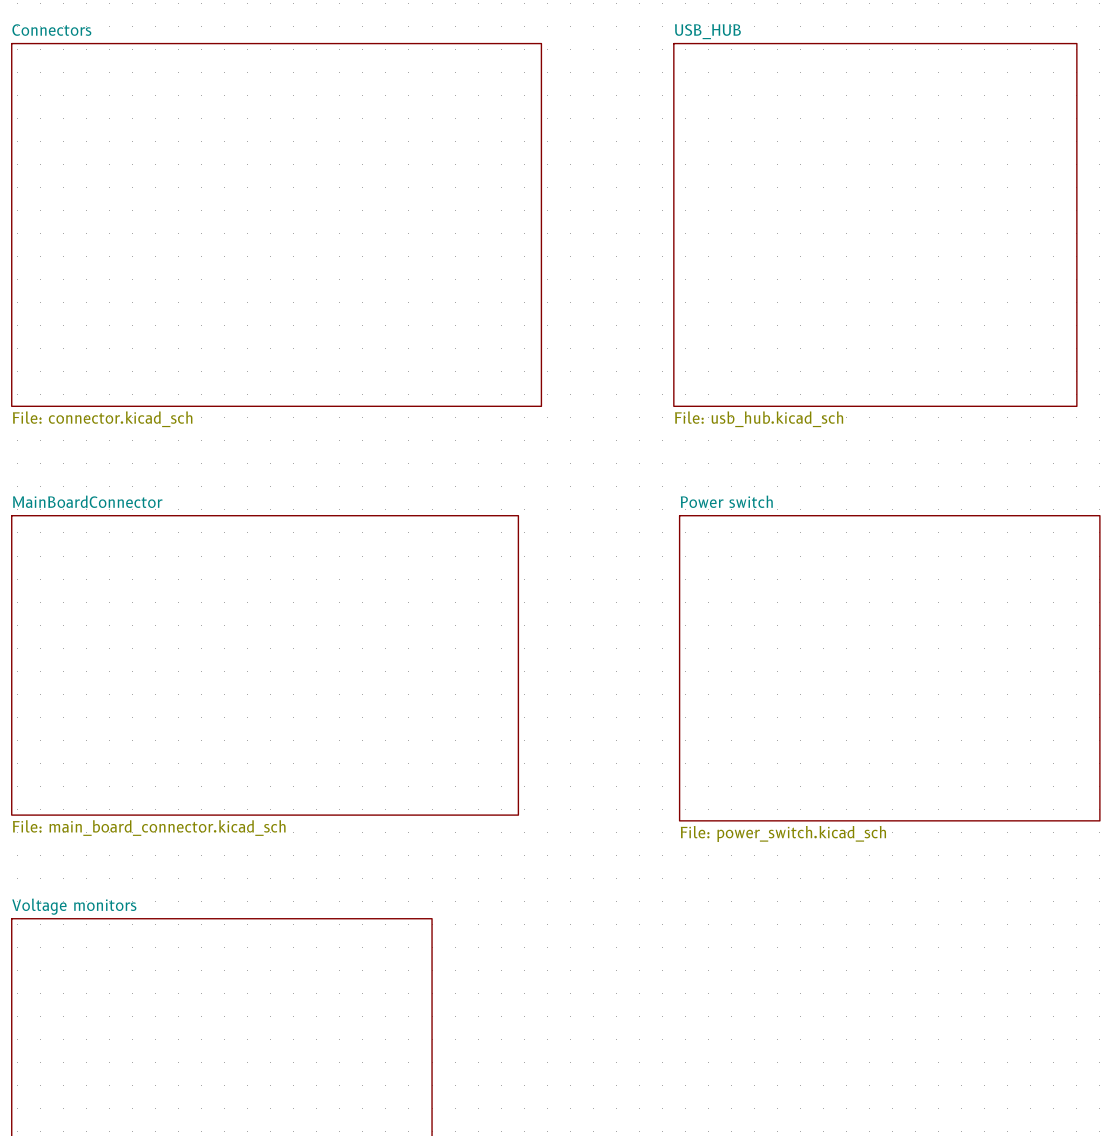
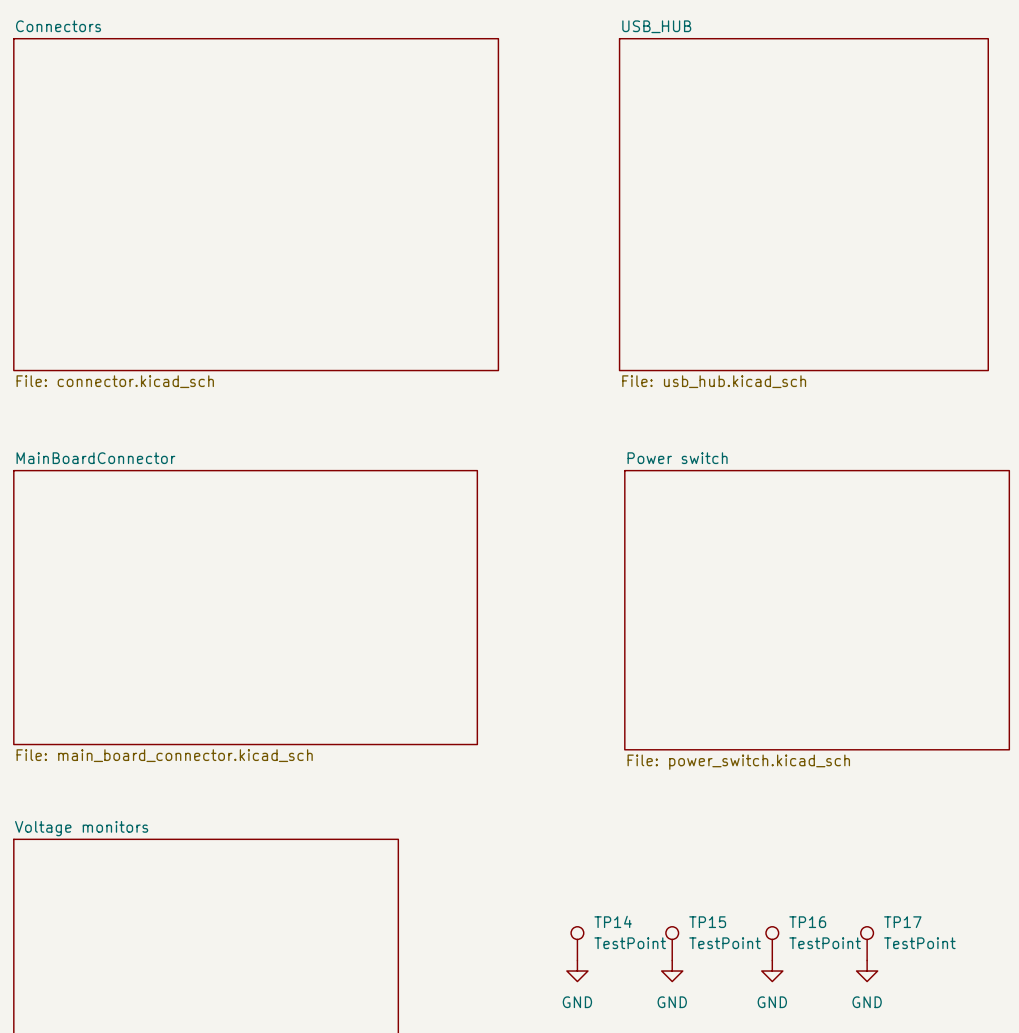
TP14: none -> TestPoint (577, 943)
TP15: none -> TestPoint (672, 943)
TP16: none -> TestPoint (772, 943)
TP17: none -> TestPoint (867, 943)
power symbol: none -> GND (577, 971)
power symbol: none -> GND (672, 971)
power symbol: none -> GND (772, 971)
power symbol: none -> GND (867, 971)

